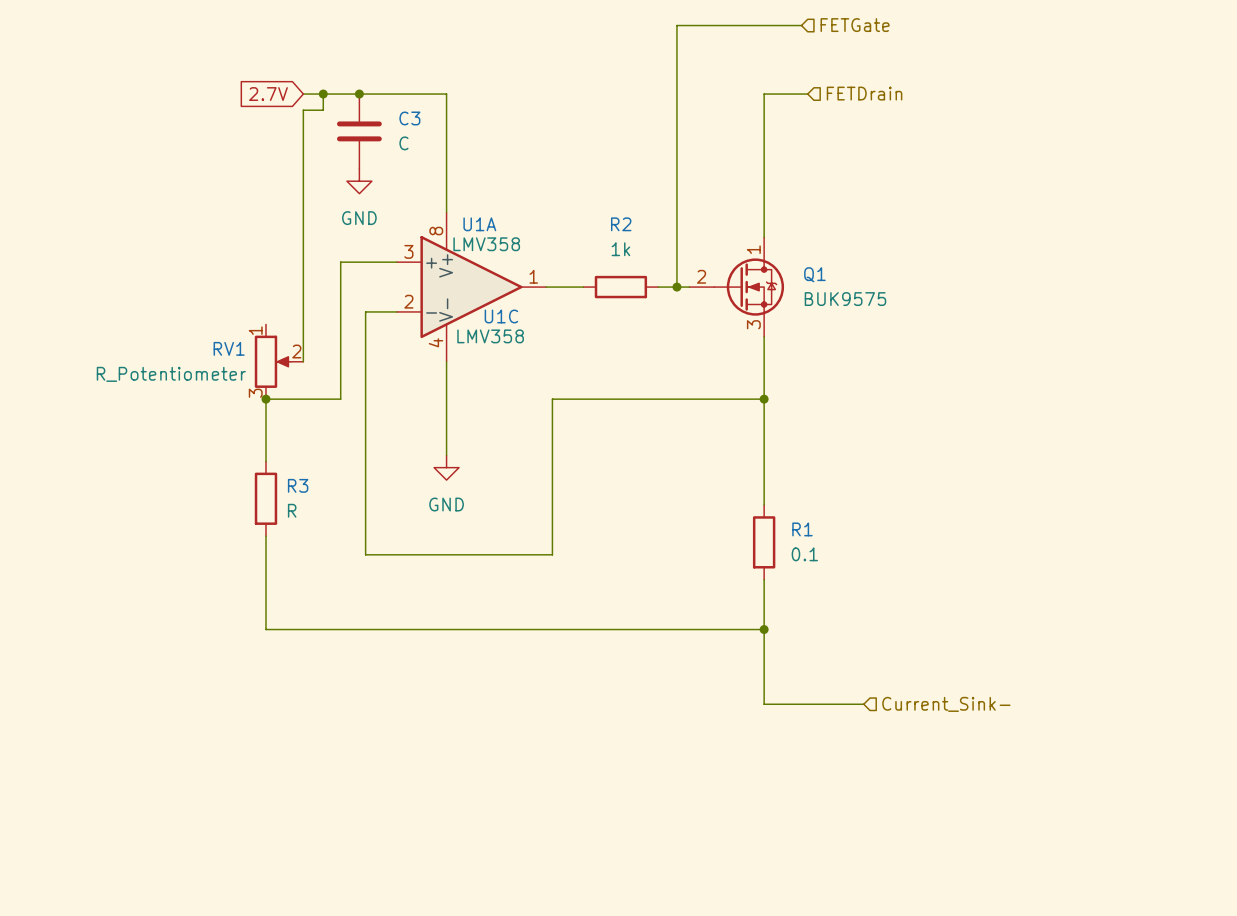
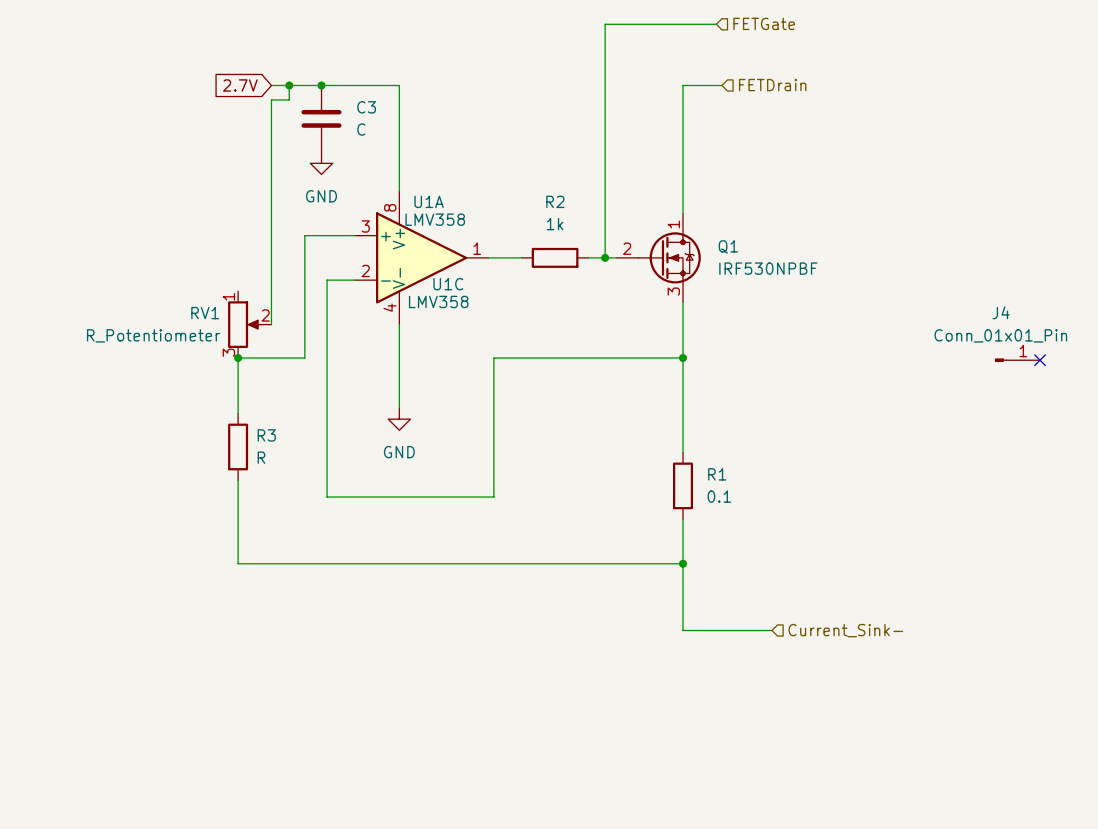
Q1 value: BUK9575 (845, 299) -> IRF530NPBF (768, 268)
J4: none -> Conn_01x01_Pin (1017, 360)
no-connect mark: none -> (1040, 360)

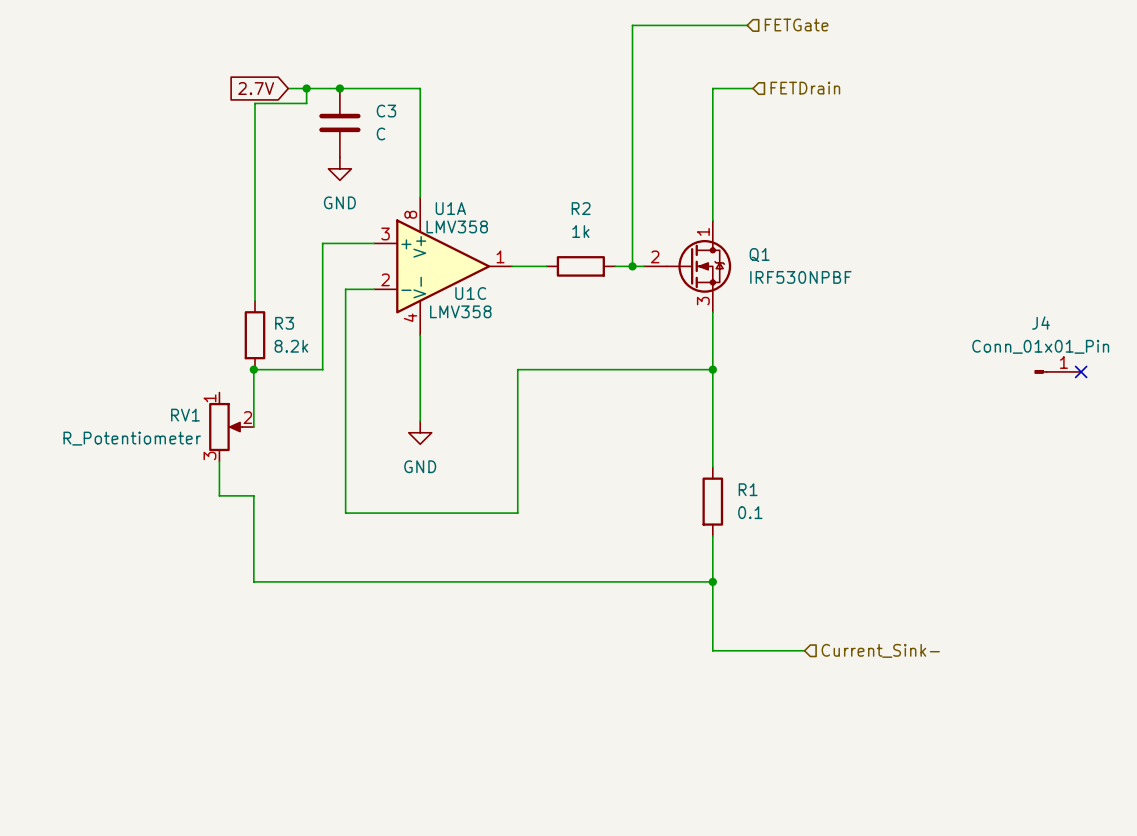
wire: (271, 99) (271, 324) -> (288, 103) (254, 103) (254, 300)
RV1 position: (249, 324) -> (231, 427)
wire: none -> (219, 461) (219, 495) (253, 495)
R3 position: (238, 446) -> (254, 335)
R3 value: R (261, 457) -> 8.2k (291, 346)

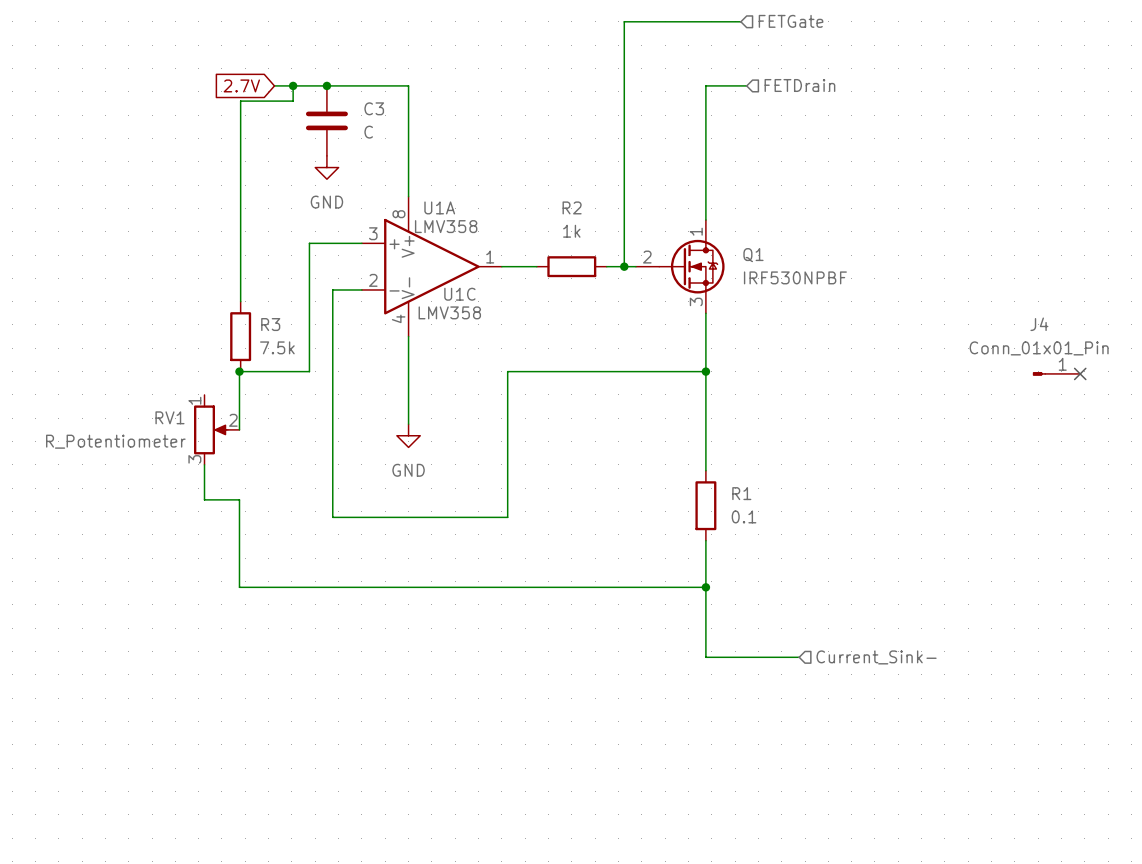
R3 value: 8.2k (291, 346) -> 7.5k (277, 347)

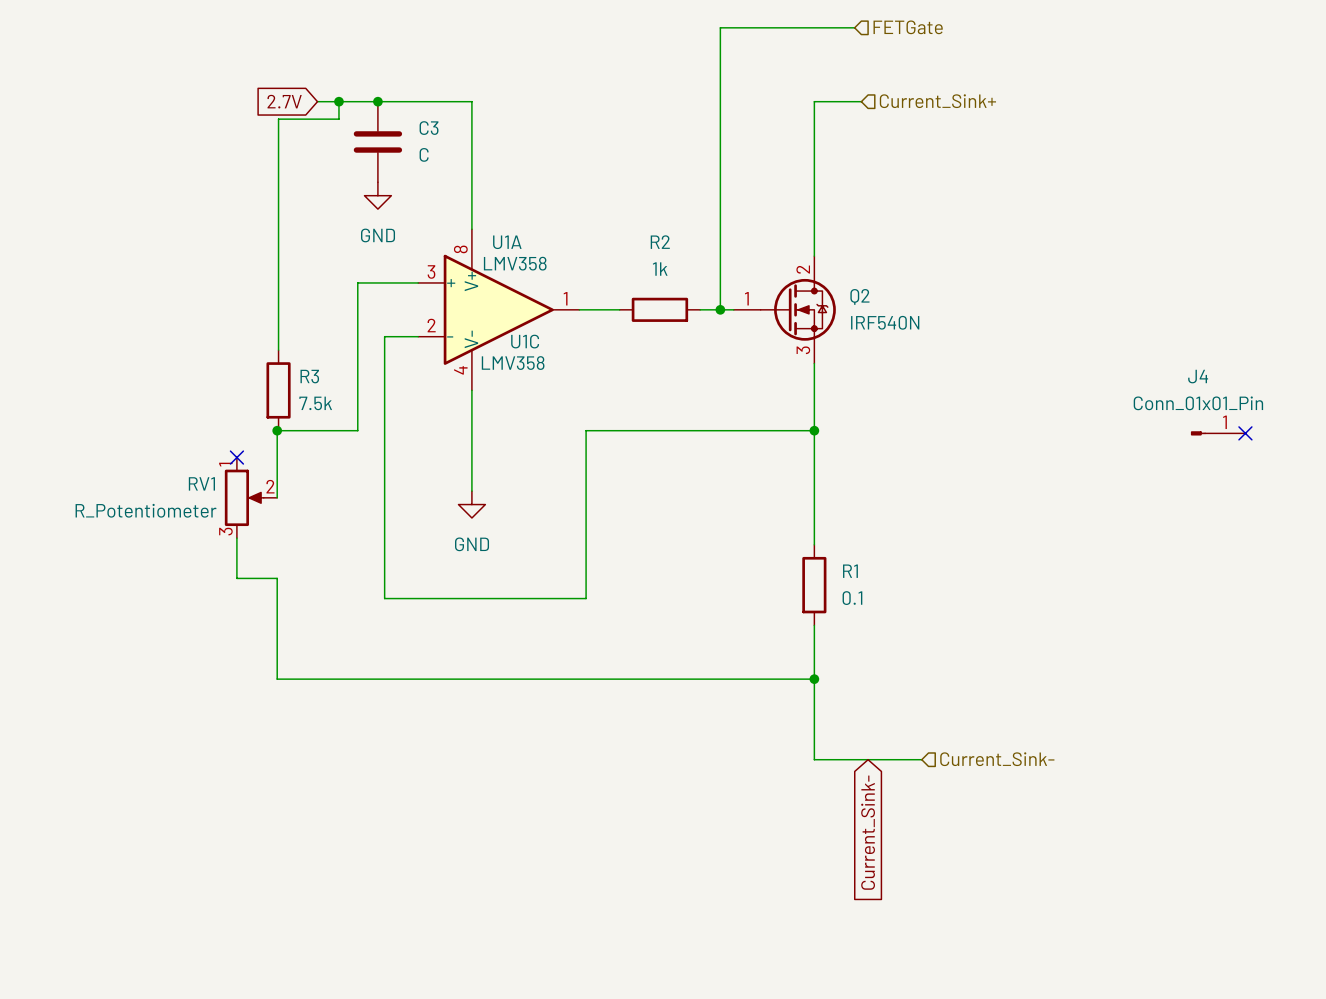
hierarchical label: FETDrain (799, 85) -> Current_Sink+ (937, 101)
Q1 pin number: 1 (696, 231) -> 2 (803, 269)
Q1 name: Q1 (753, 255) -> Q2 (859, 296)
Q1 pin number: 2 (647, 257) -> 1 (746, 298)
Q1 value: IRF530NPBF (795, 277) -> IRF540N (885, 322)
no-connect mark: none -> (236, 457)
global label: none -> Current_Sink- (868, 832)

